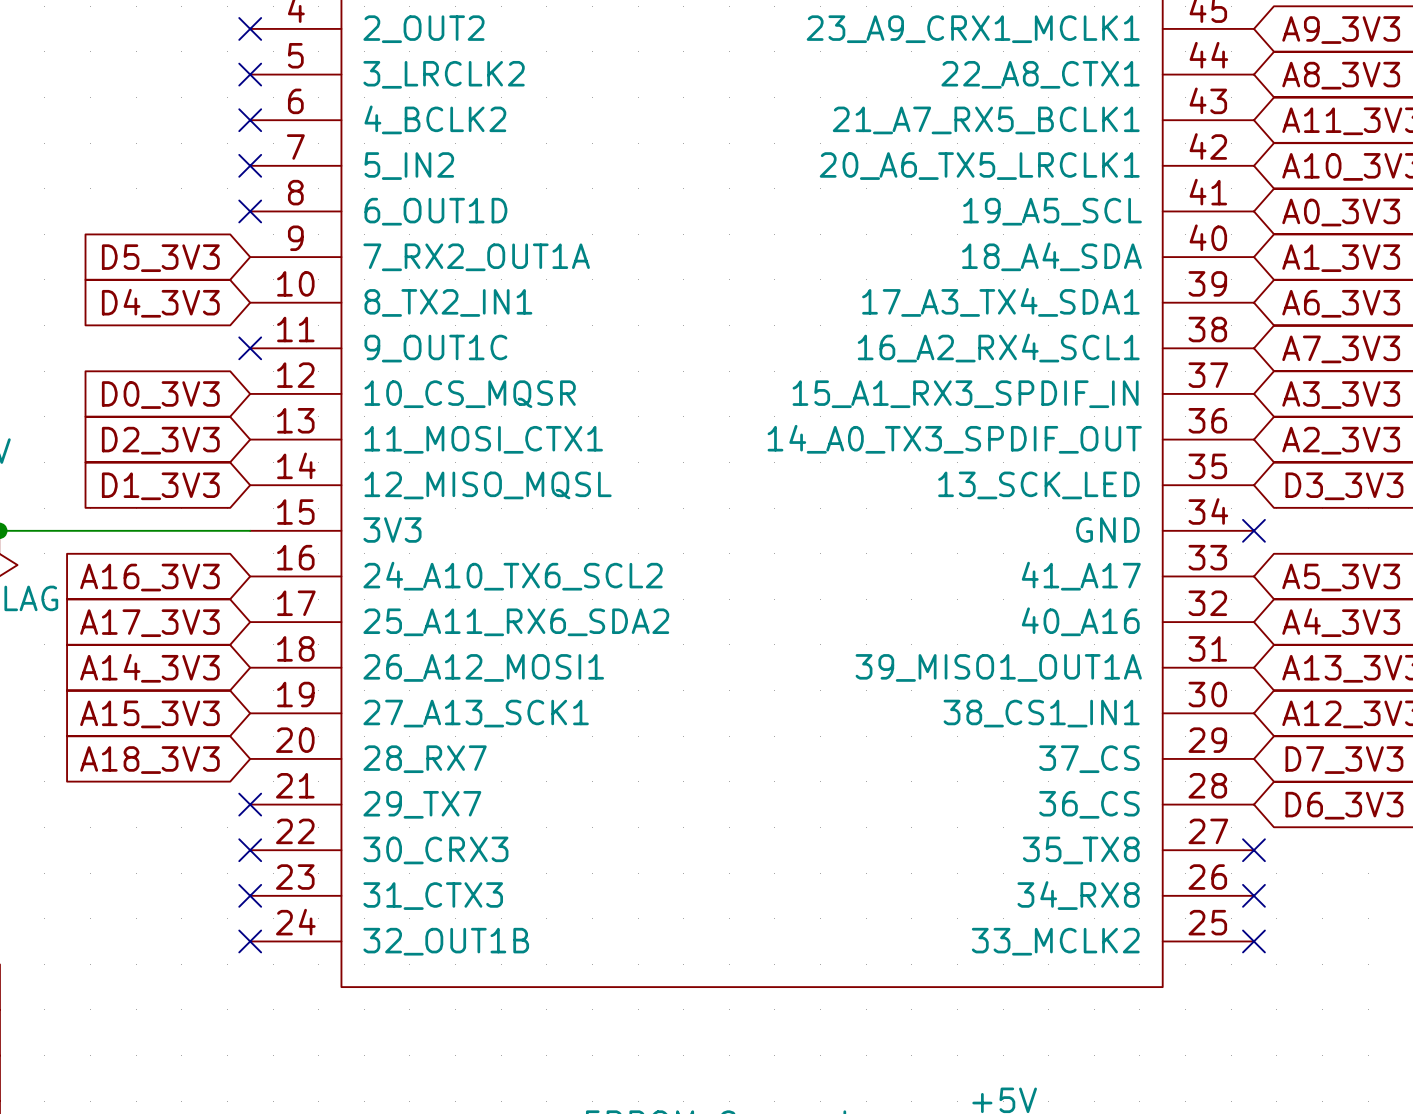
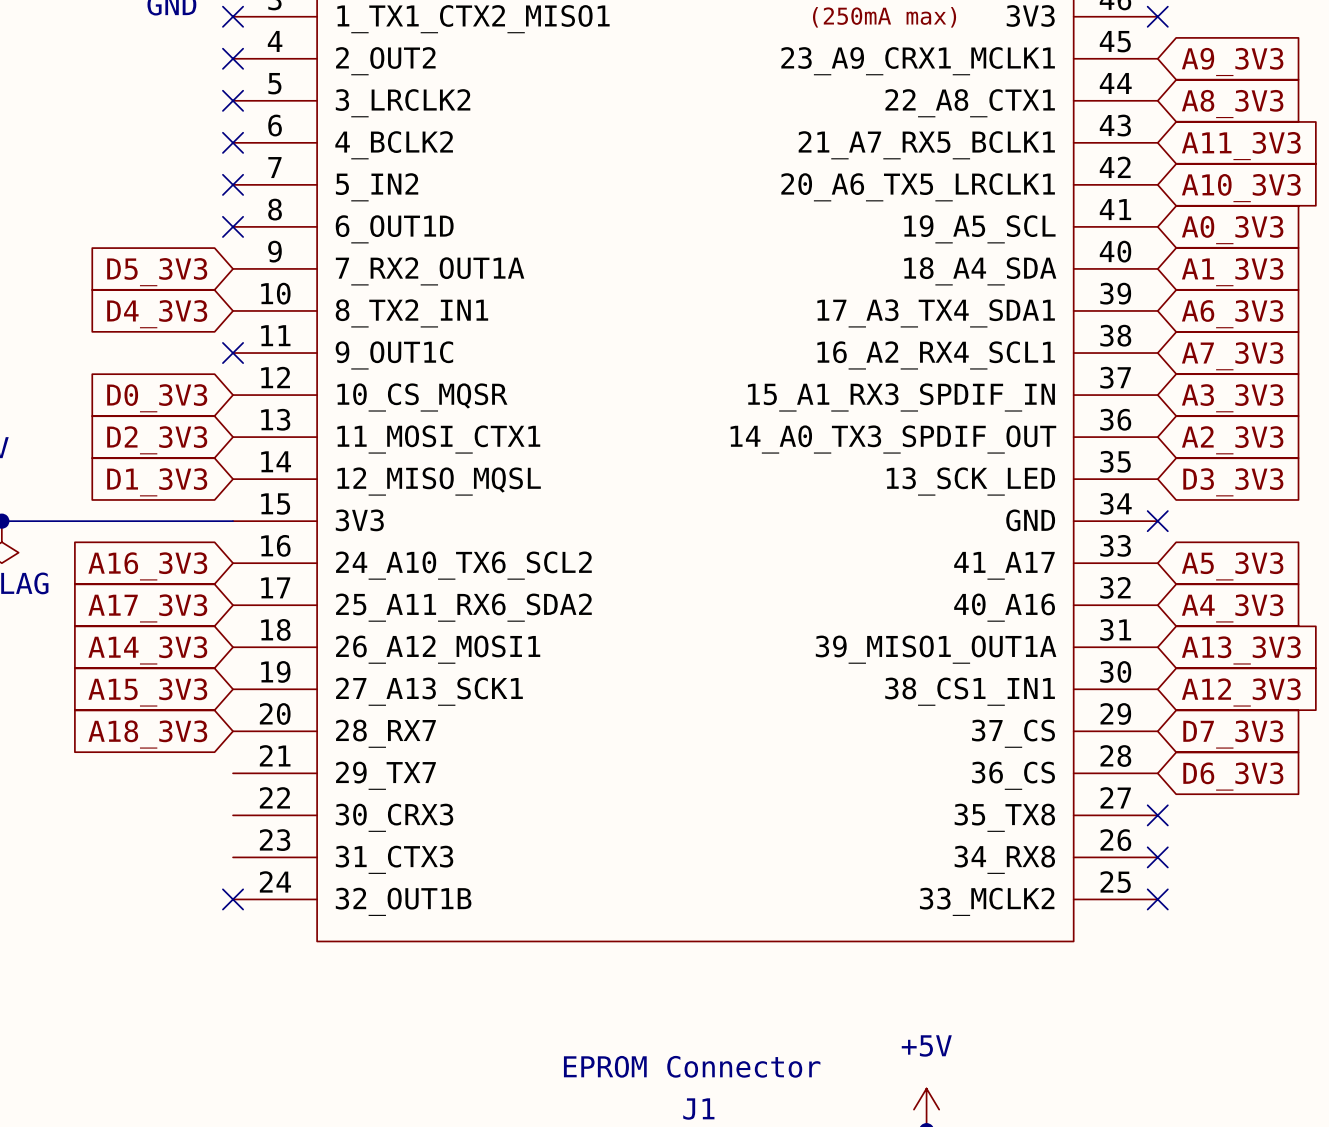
no-connect mark: (250, 804) -> none
no-connect mark: (250, 850) -> none
no-connect mark: (250, 895) -> none

